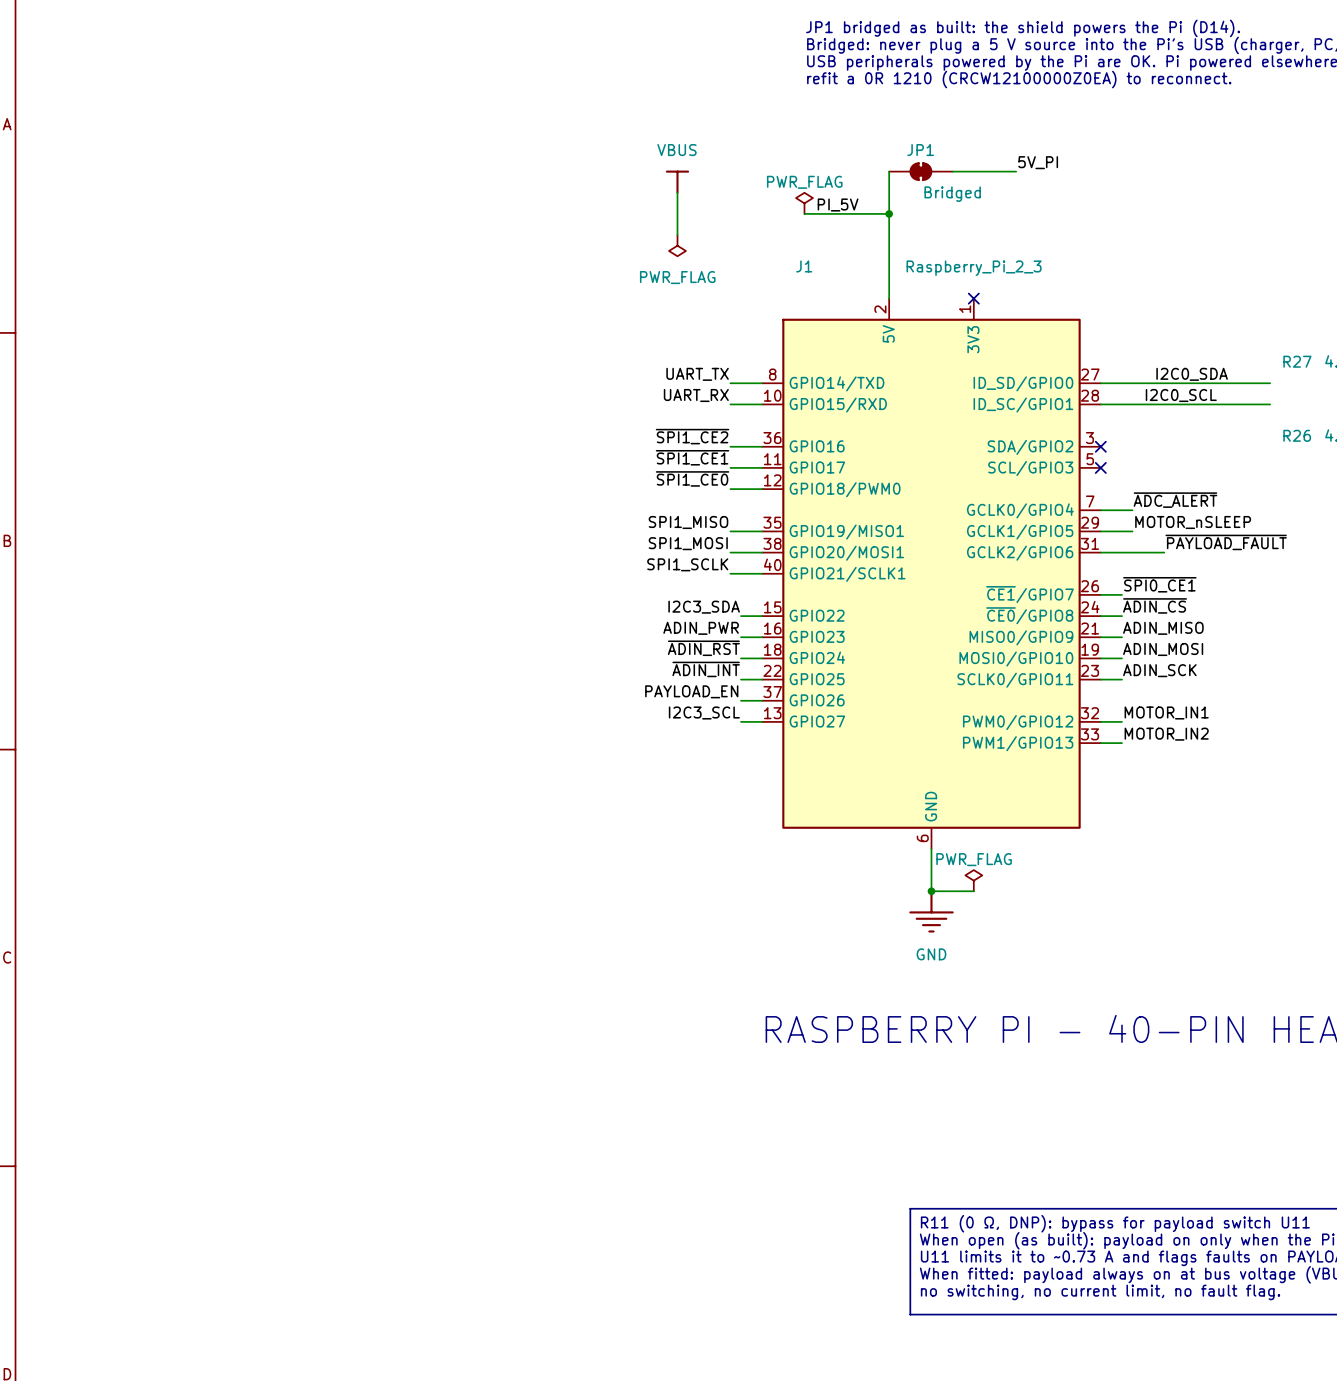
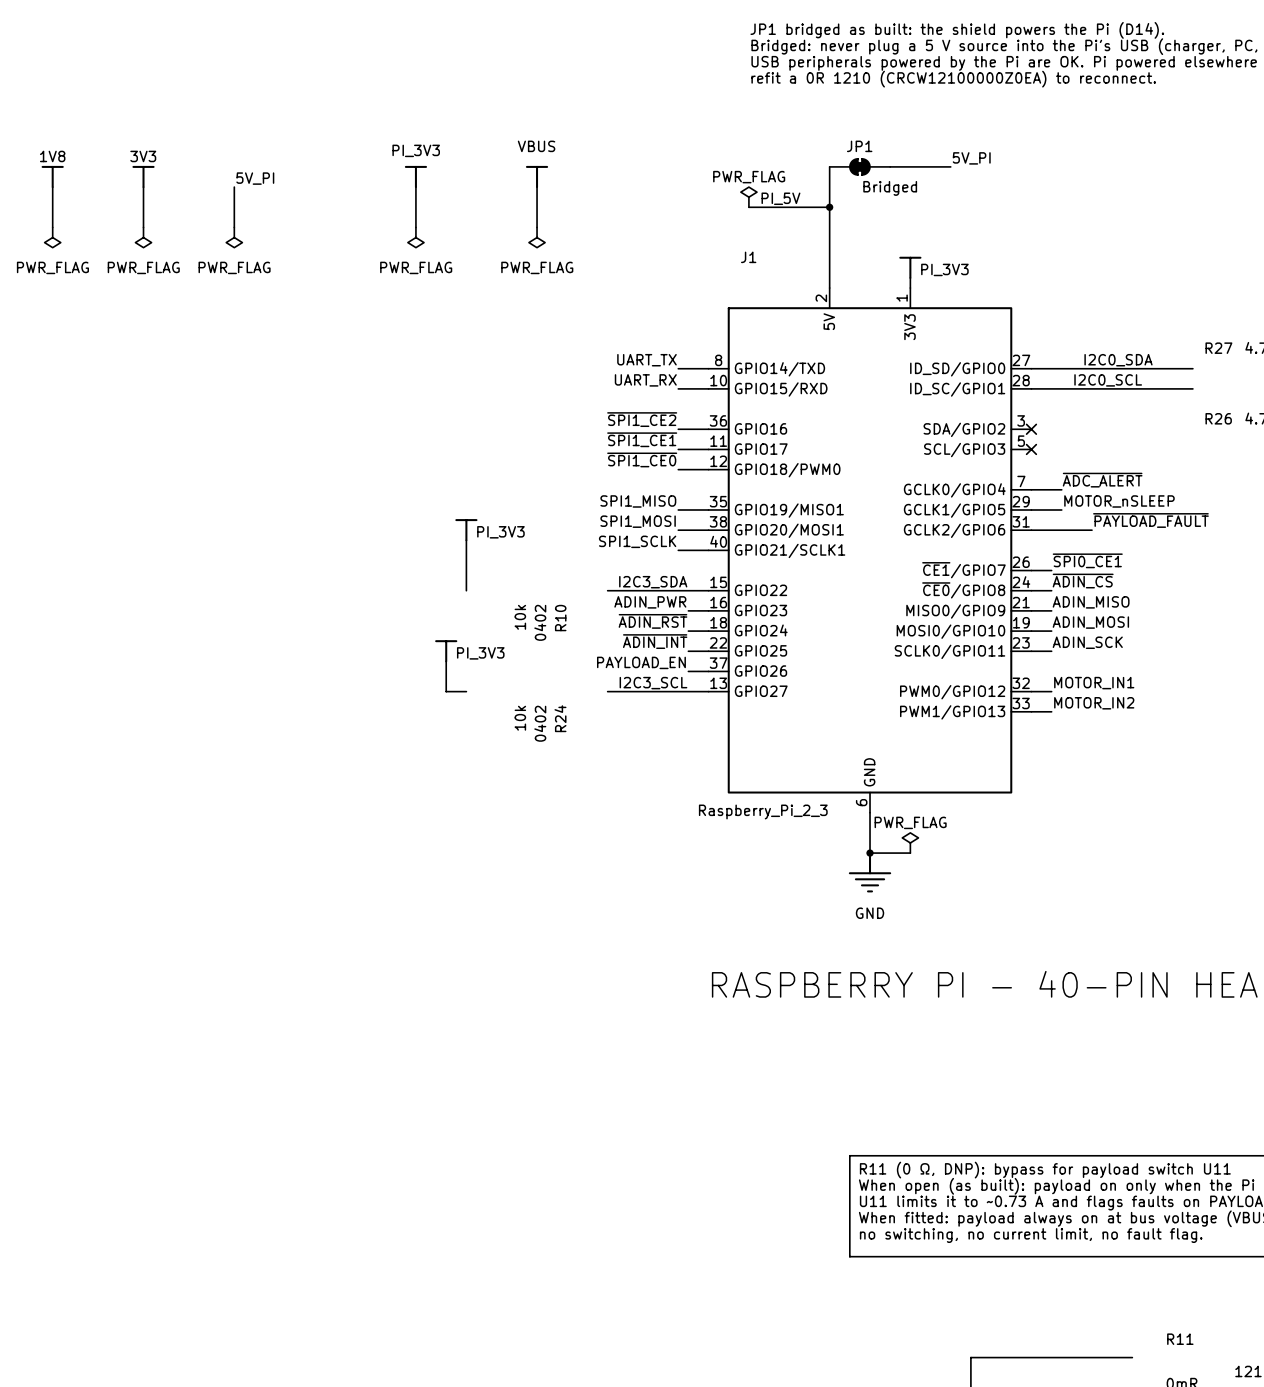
power symbol: none -> 1V8 (52, 177)
power symbol: none -> 3V3 (143, 177)
power symbol: none -> PI_3V3 (415, 177)
power symbol position: VBUS (677, 182) -> VBUS (537, 177)
label: none -> 5V_PI (255, 178)
wire: none -> (52, 187) (52, 227)
wire: none -> (143, 187) (143, 227)
wire: none -> (234, 187) (234, 227)
wire: none -> (415, 187) (415, 227)
wire: (677, 192) (677, 235) -> (537, 187) (537, 227)
power symbol: none -> PWR_FLAG (52, 237)
power symbol: none -> PWR_FLAG (143, 237)
power symbol: none -> PWR_FLAG (234, 237)
power symbol: none -> PWR_FLAG (415, 237)
power symbol position: PWR_FLAG (677, 245) -> PWR_FLAG (537, 237)
J1 value position: Raspberry_Pi_2_3 (974, 268) -> Raspberry_Pi_2_3 (763, 811)
power symbol: none -> PI_3V3 (910, 267)
wire: none -> (910, 277) (910, 288)
no-connect mark: (973, 298) -> none
power symbol: none -> PI_3V3 (466, 530)
wire: none -> (466, 540) (466, 590)
wire: none -> (607, 590) (688, 590)
R10: none -> (540, 622)
power symbol: none -> PI_3V3 (446, 651)
wire: none -> (446, 661) (446, 691) (466, 691)
wire: none -> (607, 691) (688, 691)
R24: none -> (540, 723)

